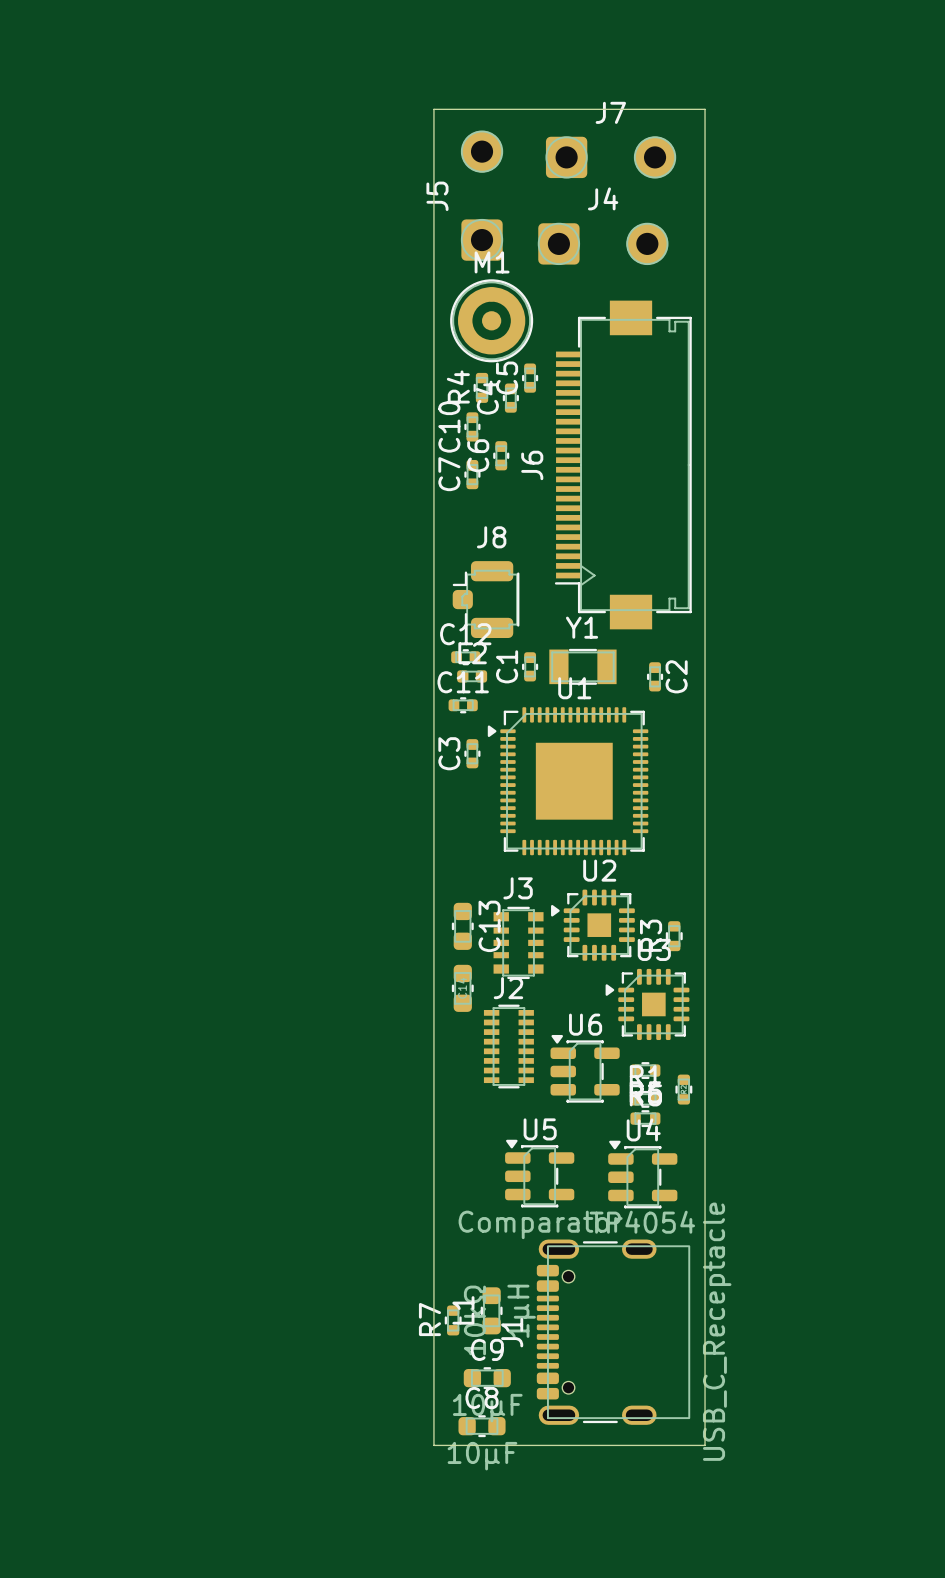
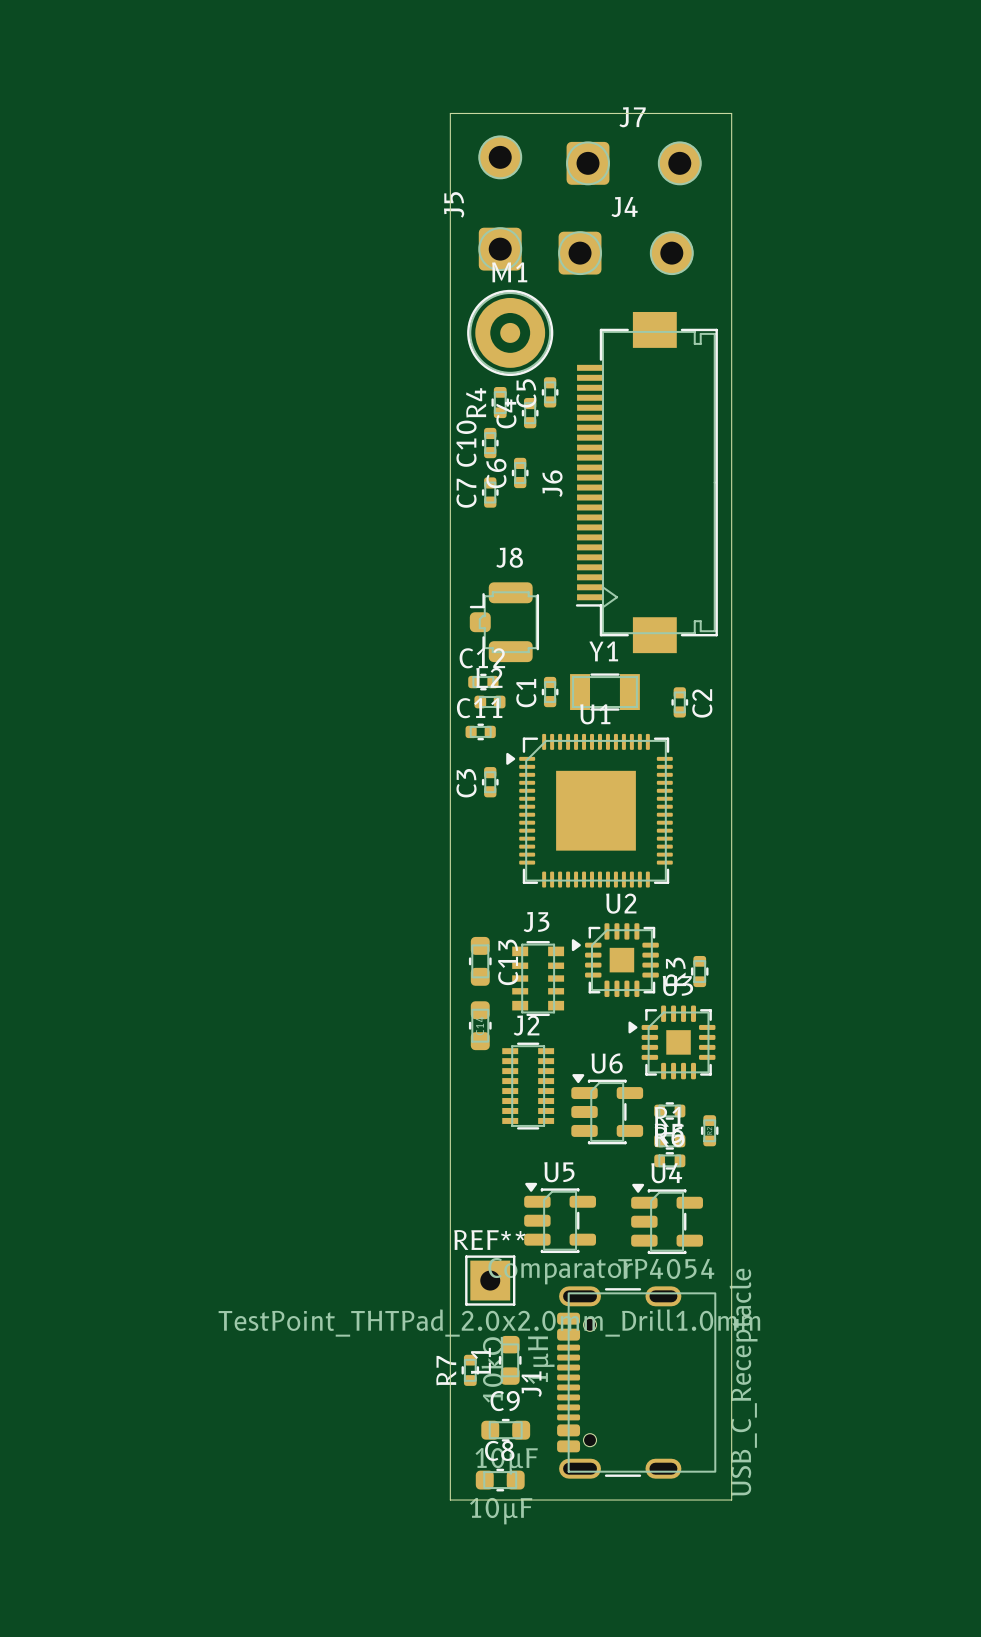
REF**: none -> TestPoint_THTPad_2.0x2.0mm_Drill1.0mm (490, 1280)

